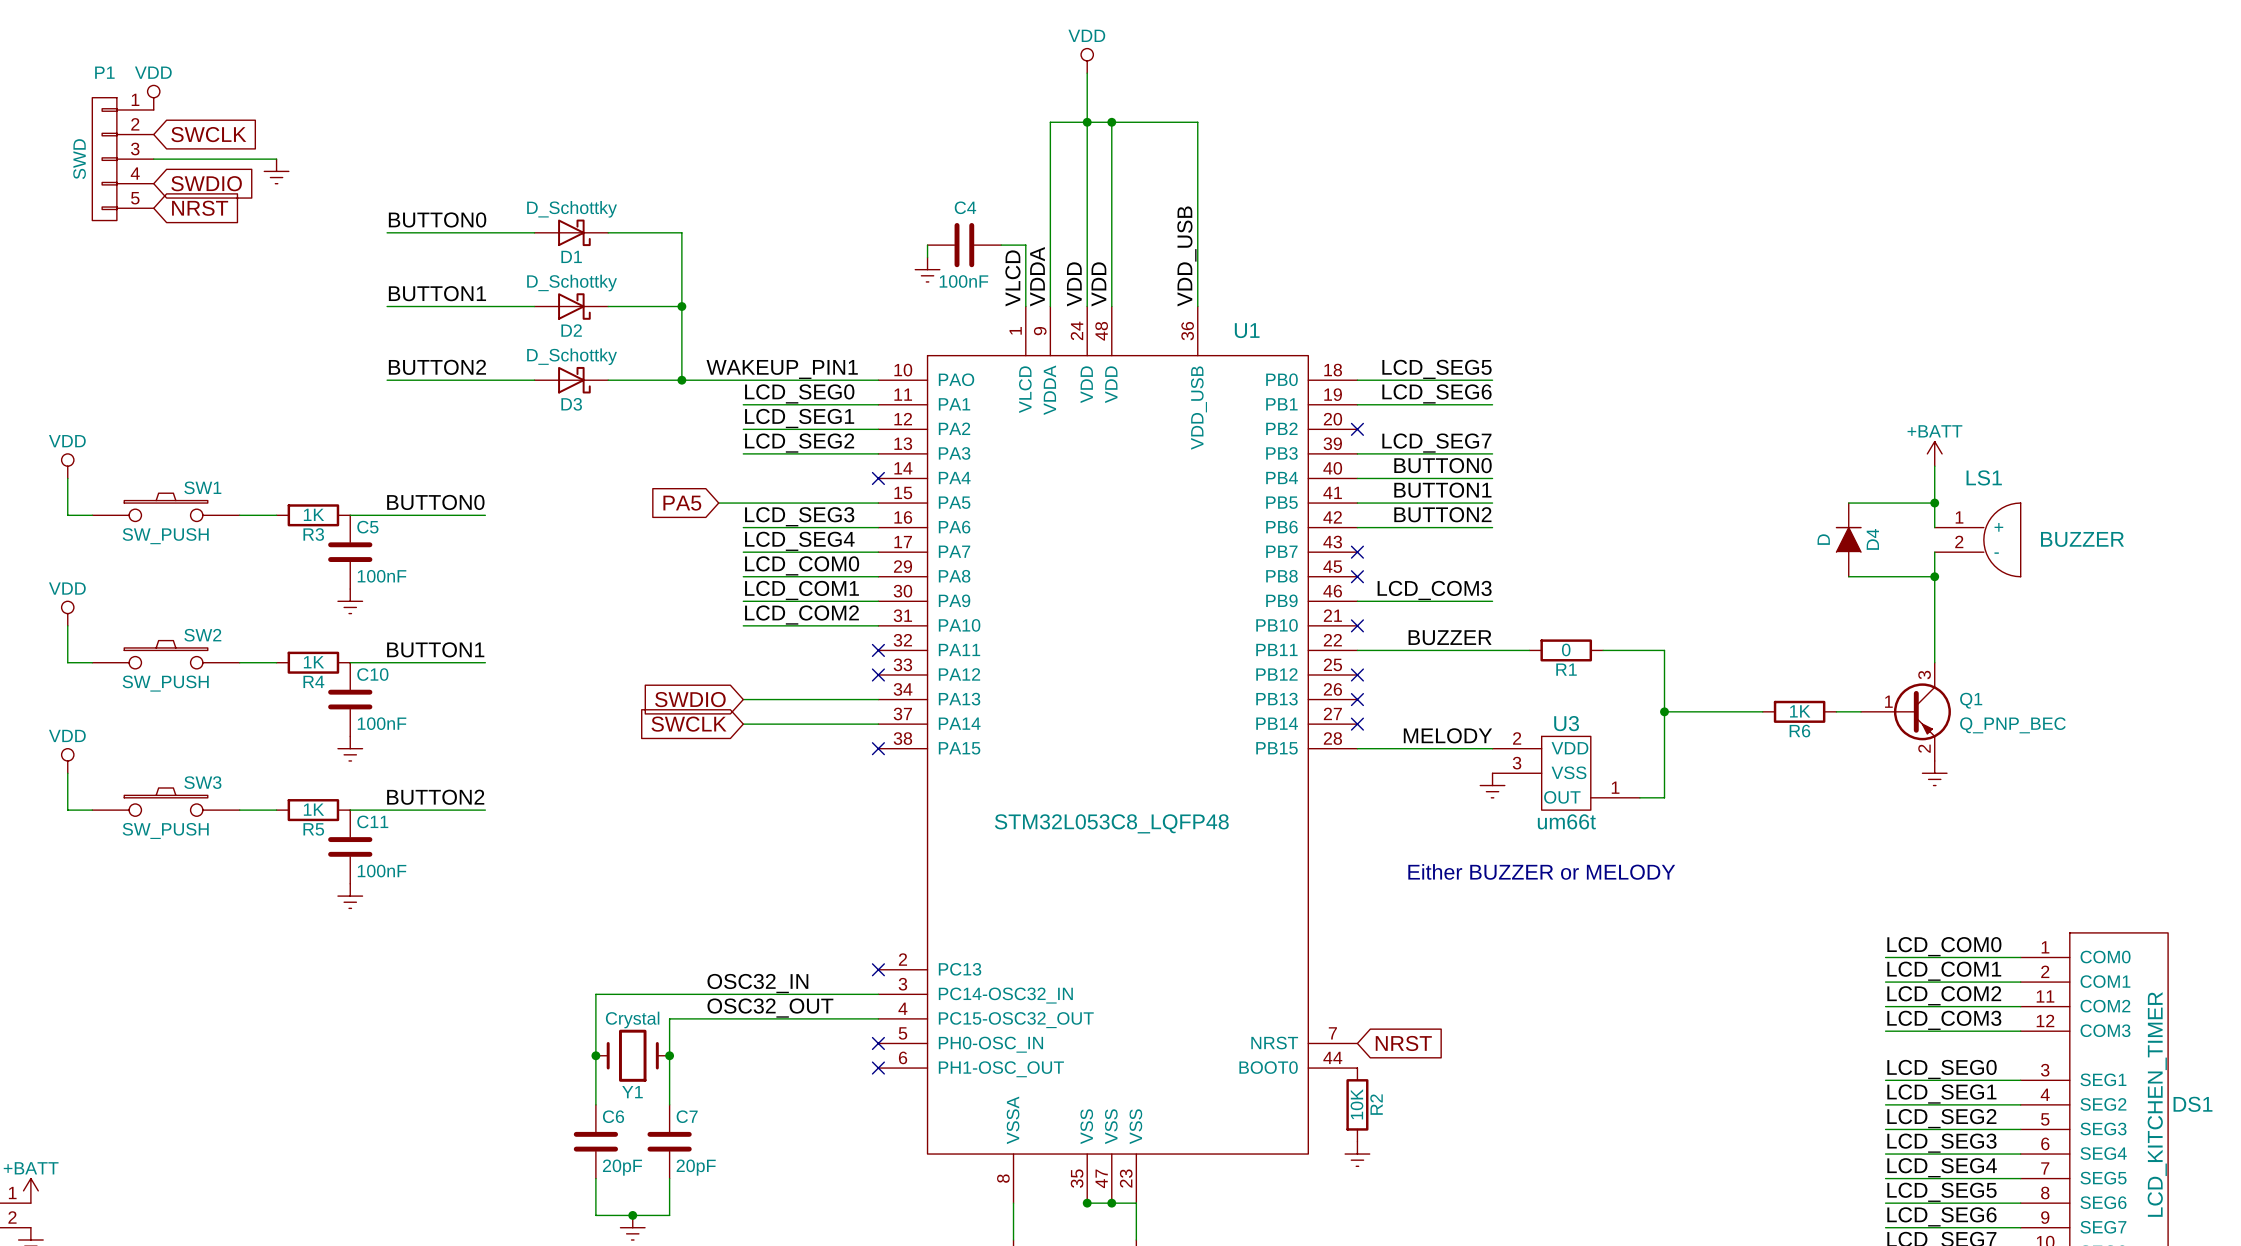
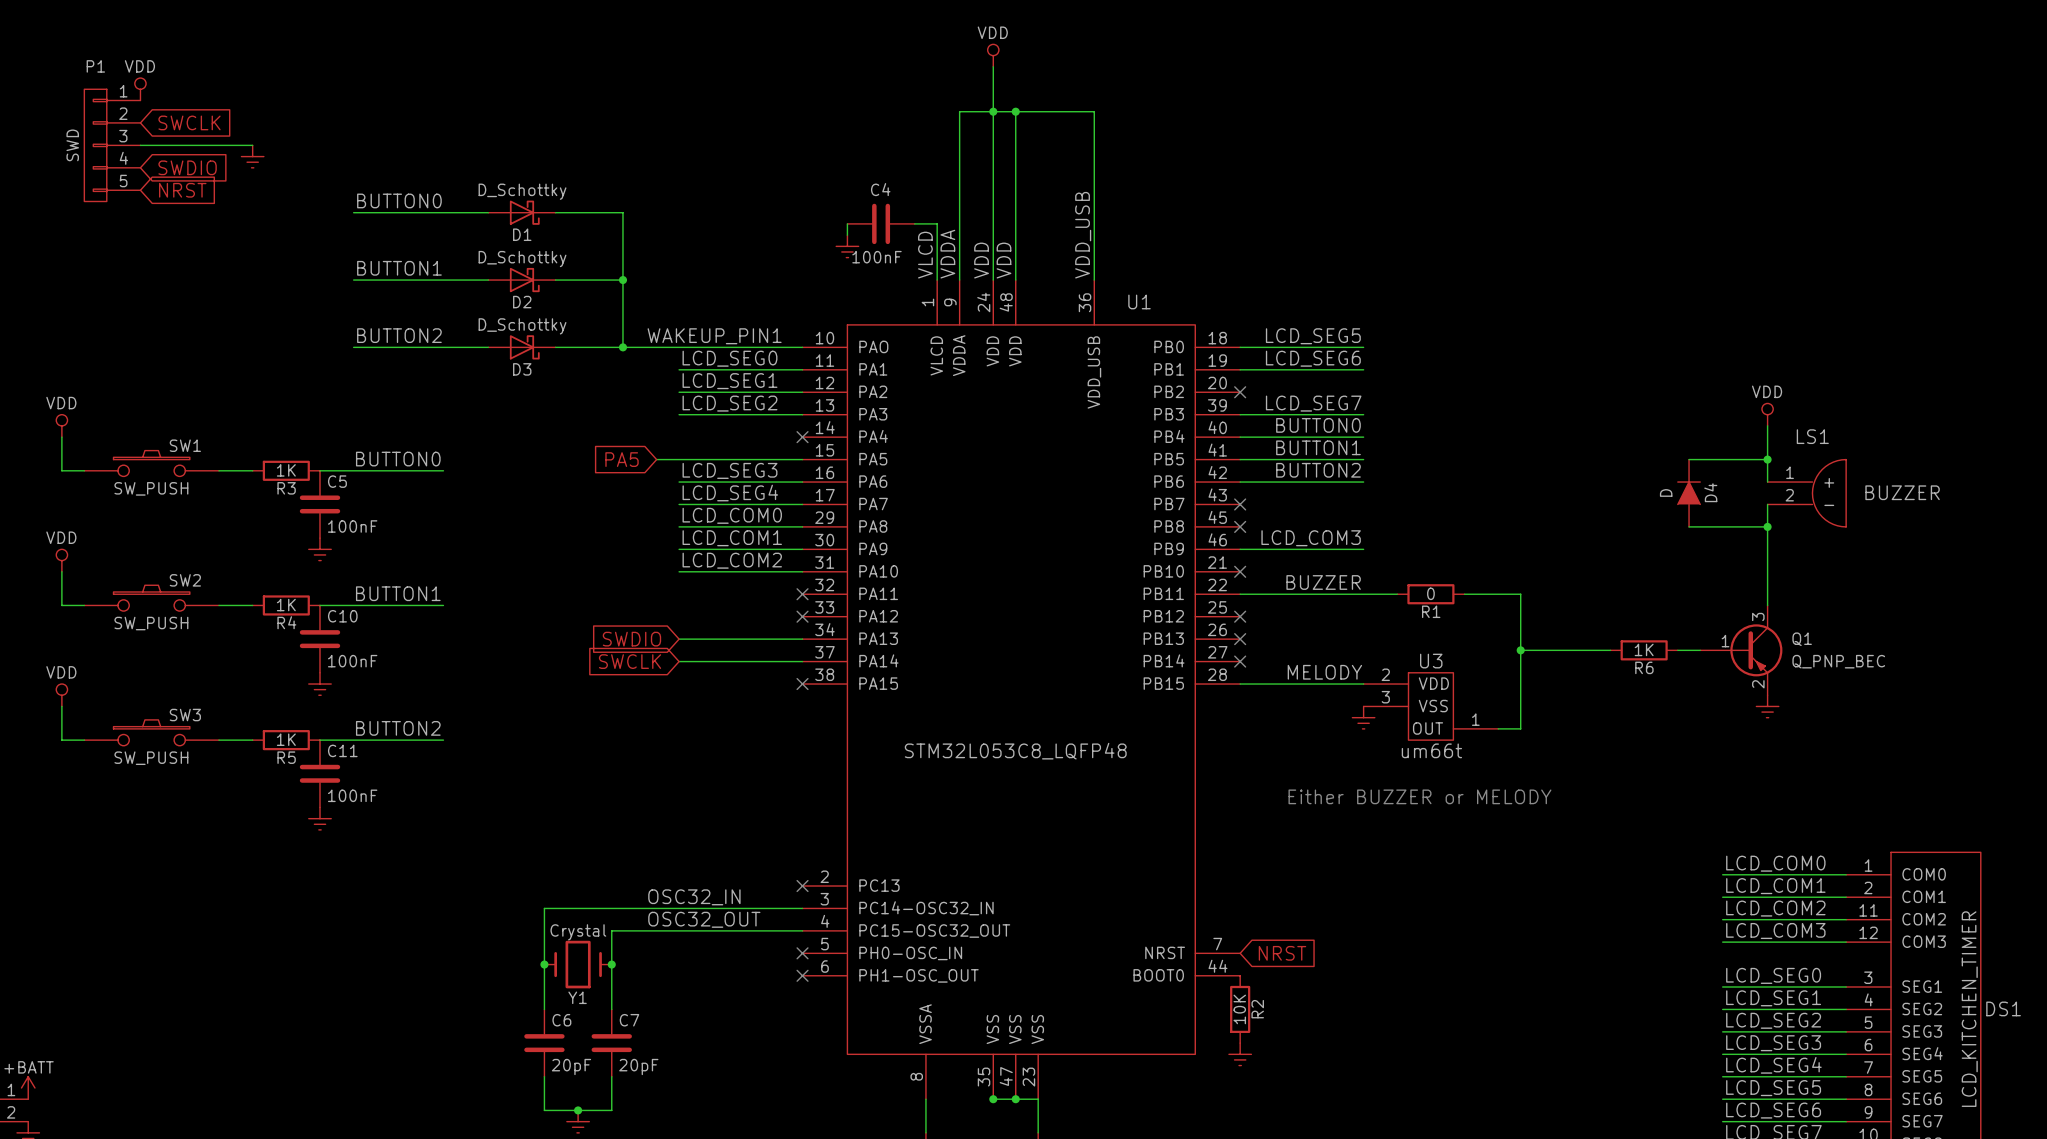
power symbol: +BATT (1934, 453) -> VDD (1767, 414)

